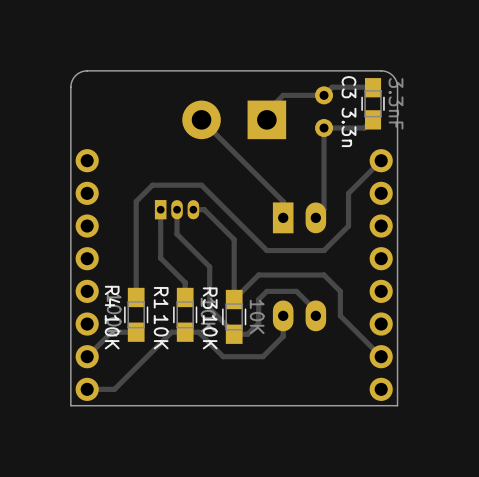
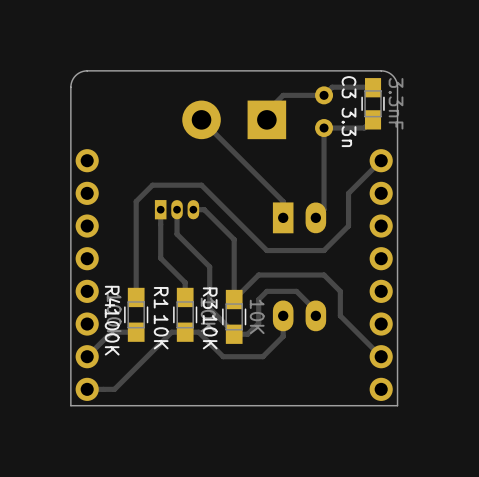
text: 10K (112, 332) -> 100K (112, 332)

